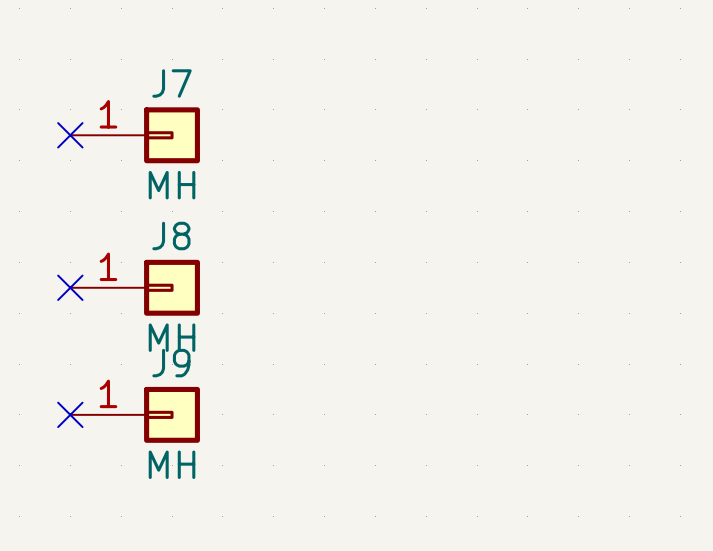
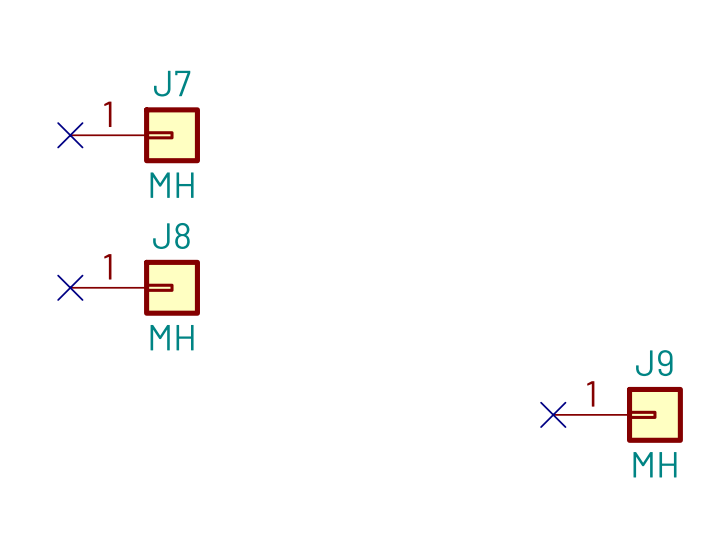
no-connect mark: (70, 414) -> none
J9 position: (135, 414) -> (618, 414)
no-connect mark: none -> (553, 414)

